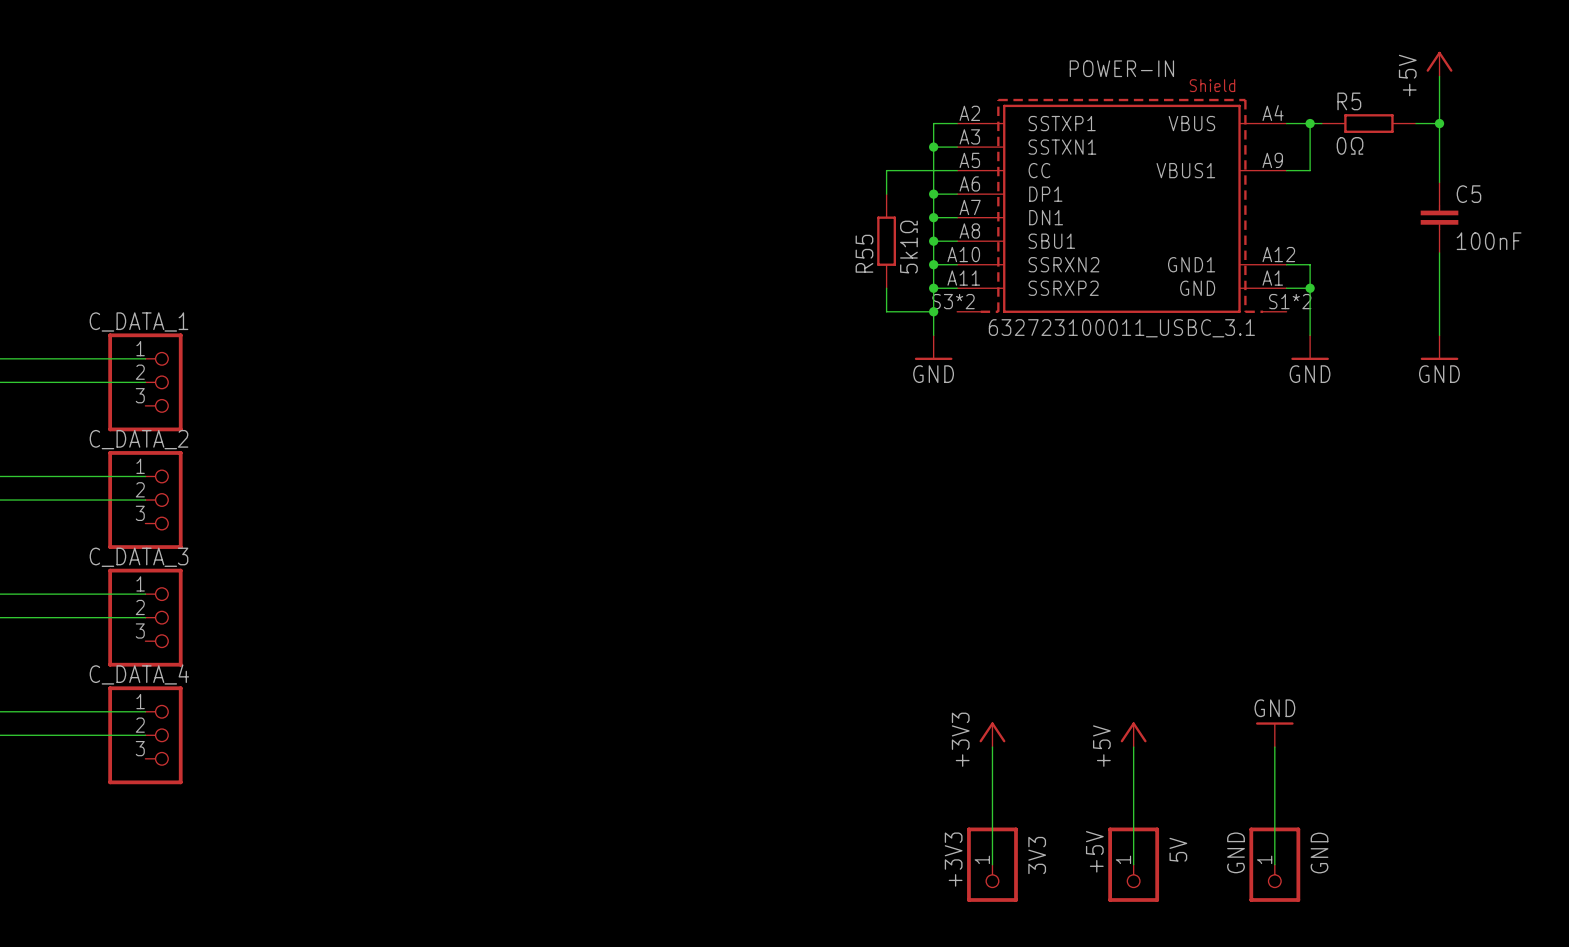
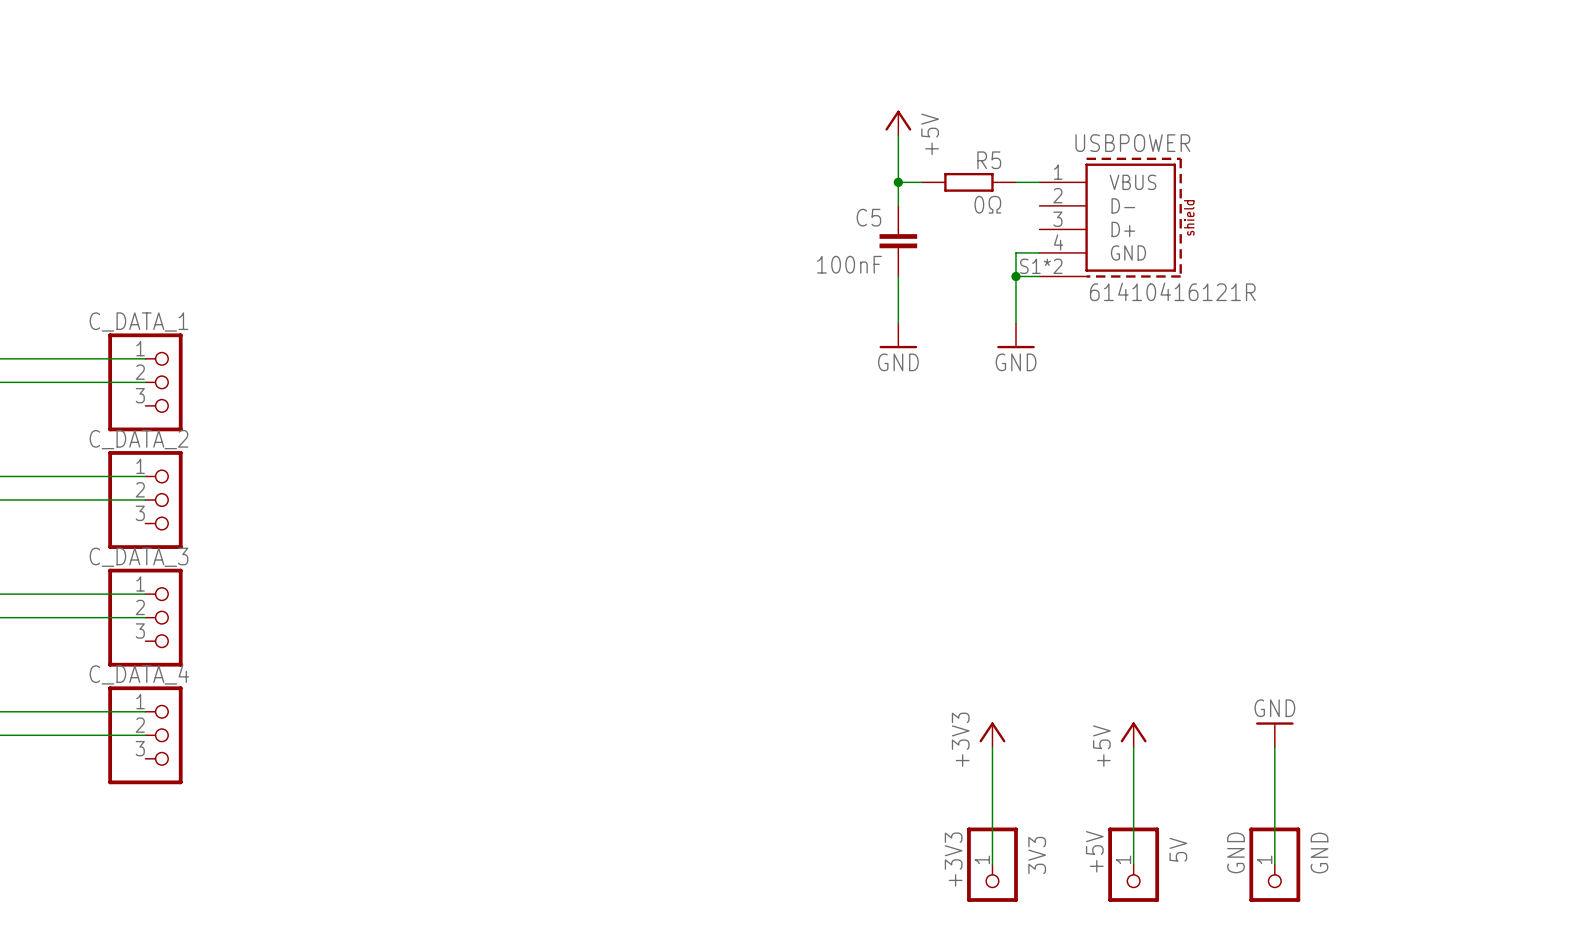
power symbol: +5V (1439, 64) -> none
wire: (1439, 76) (1439, 182) -> none
R5 name position: R5 (1349, 101) -> R5 (989, 160)
power symbol: none -> +5V (898, 122)
wire: (957, 123) (933, 123) (933, 335) -> none
wire: (1286, 123) (1321, 123) -> none
wire: (1310, 123) (1310, 170) (1286, 170) -> none
junction: (1310, 123) -> none
R5 position: (1368, 123) -> (968, 182)
wire: (1415, 123) (1439, 123) -> none
junction: (1439, 123) -> none
wire: none -> (898, 135) (898, 205)
R5 value position: 0Ω (1350, 145) -> 0Ω (987, 204)
wire: (933, 147) (957, 147) -> (898, 182) (921, 182)
junction: (933, 147) -> none
wire: (957, 170) (886, 170) (886, 194) -> none
junction: none -> (898, 182)
wire: (933, 194) (957, 194) -> (1016, 182) (1039, 182)
junction: (933, 194) -> none
C5 name position: C5 (1468, 194) -> C5 (868, 217)
POWER-IN: 632723100011_USBC_3.1 (1121, 205) -> none
wire: (933, 217) (957, 217) -> none
junction: (933, 217) -> none
USBPOWER: none -> 61410416121R (1110, 217)
C5 position: (1439, 217) -> (898, 241)
R55: 5k1Ω (886, 241) -> none
wire: (933, 241) (957, 241) -> none
junction: (933, 241) -> none
C5 value position: 100nF (1489, 241) -> 100nF (849, 264)
wire: none -> (1039, 252) (1016, 252) (1016, 323)
wire: (1439, 252) (1439, 335) -> none
wire: (933, 264) (957, 264) -> none
junction: (933, 264) -> none
wire: (1286, 264) (1310, 264) (1310, 335) -> none
wire: none -> (898, 276) (898, 323)
junction: none -> (1016, 276)
wire: (886, 288) (886, 311) (933, 311) -> none
wire: (933, 288) (957, 288) -> (1016, 276) (1039, 276)
junction: (933, 288) -> none
wire: (1286, 288) (1310, 288) -> none
junction: (1310, 288) -> none
junction: (933, 311) -> none
power symbol: none -> GND (1016, 335)
power symbol position: GND (933, 347) -> GND (898, 335)
power symbol: GND (1310, 347) -> none
power symbol: GND (1439, 347) -> none
power symbol text position: GND (933, 374) -> GND (898, 362)

